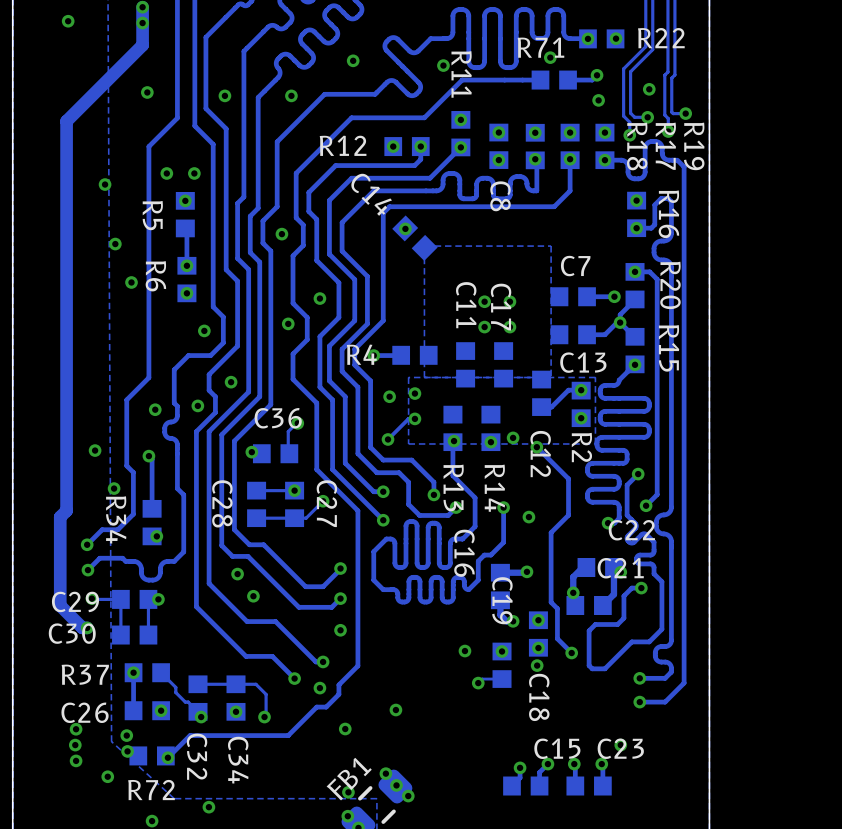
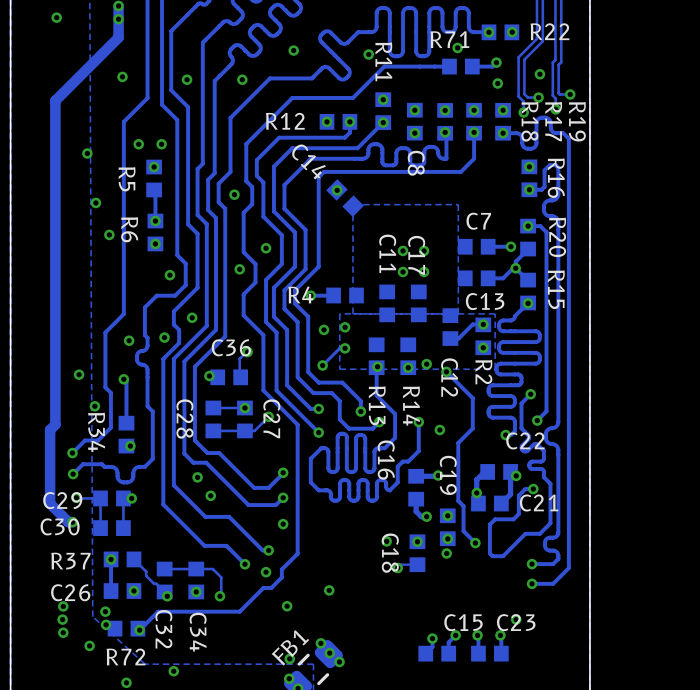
C21 name position: C21 (620, 568) -> C21 (539, 502)
C19 name position: C19 (502, 600) -> C19 (448, 475)
C18 name position: C18 (539, 697) -> C18 (390, 553)

